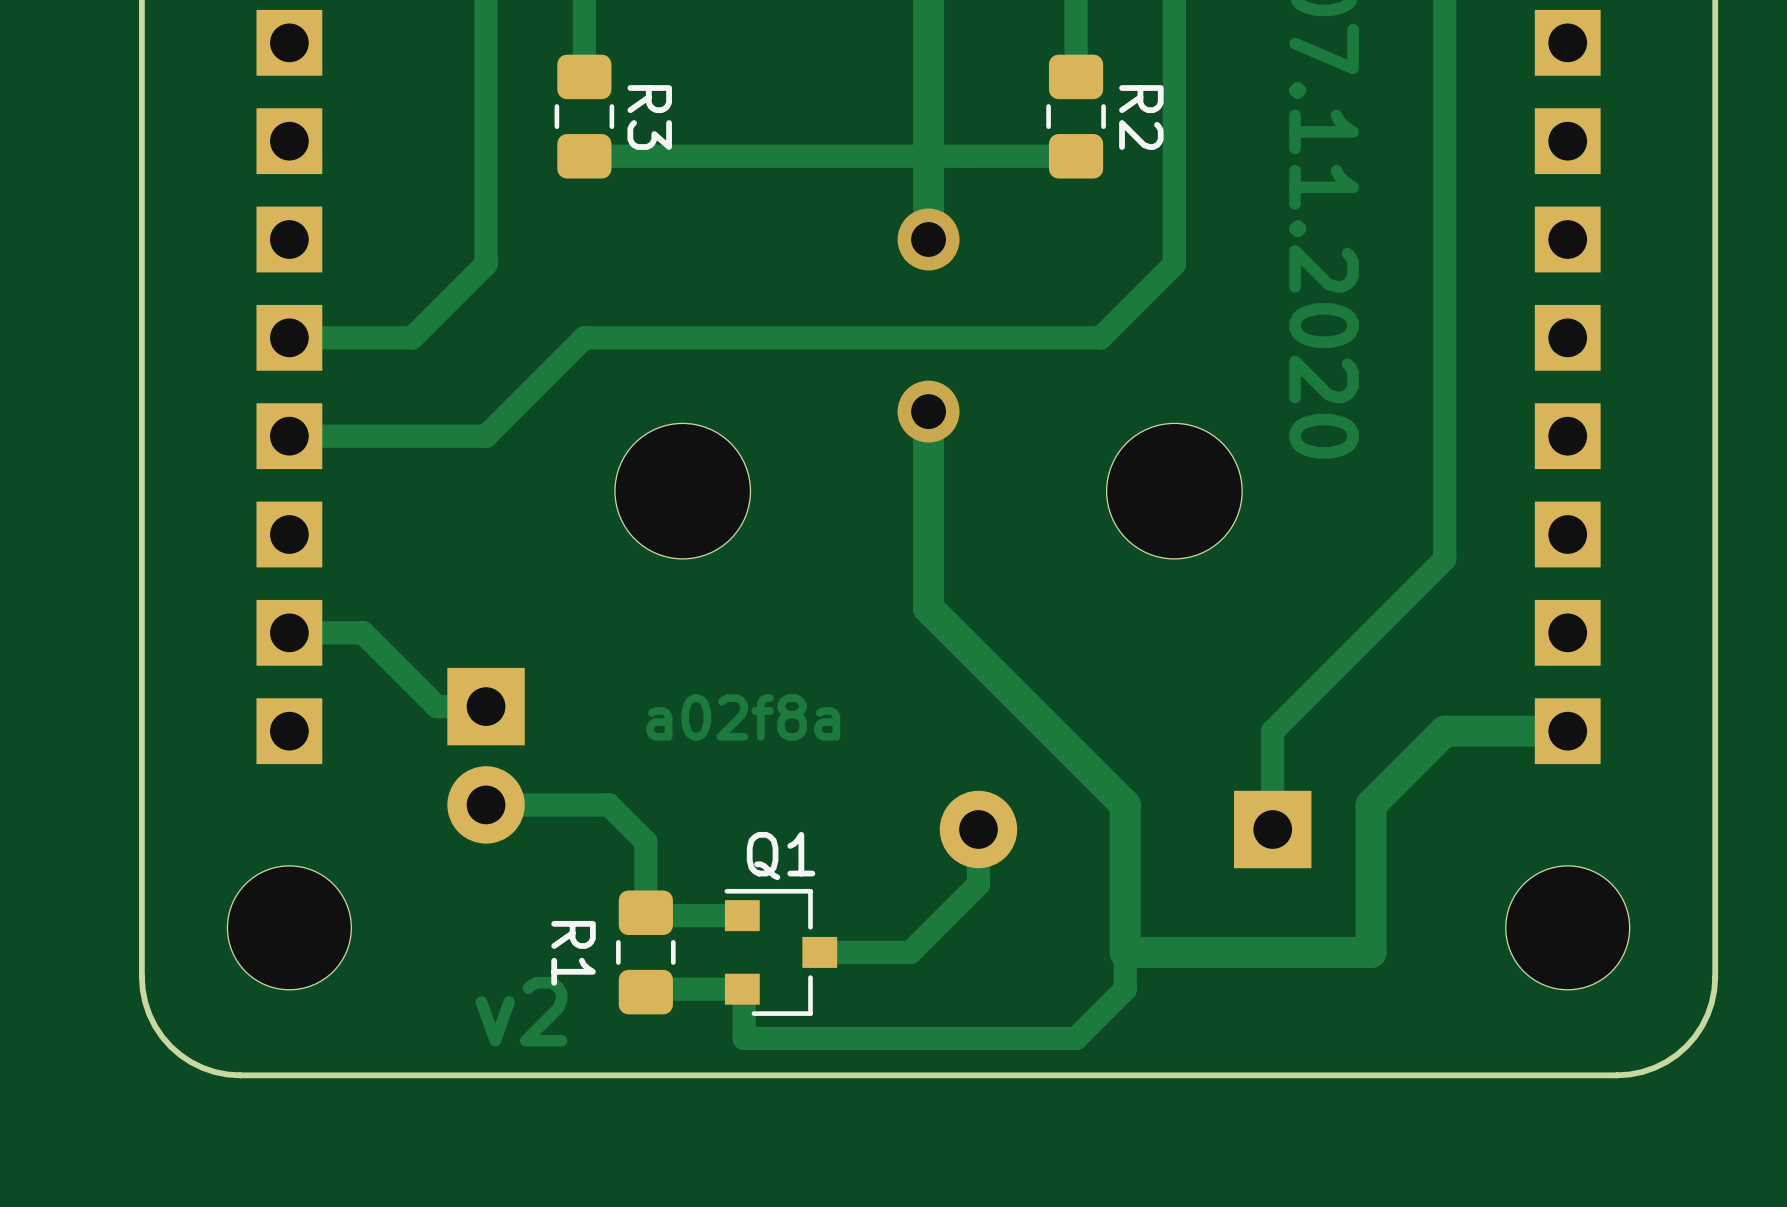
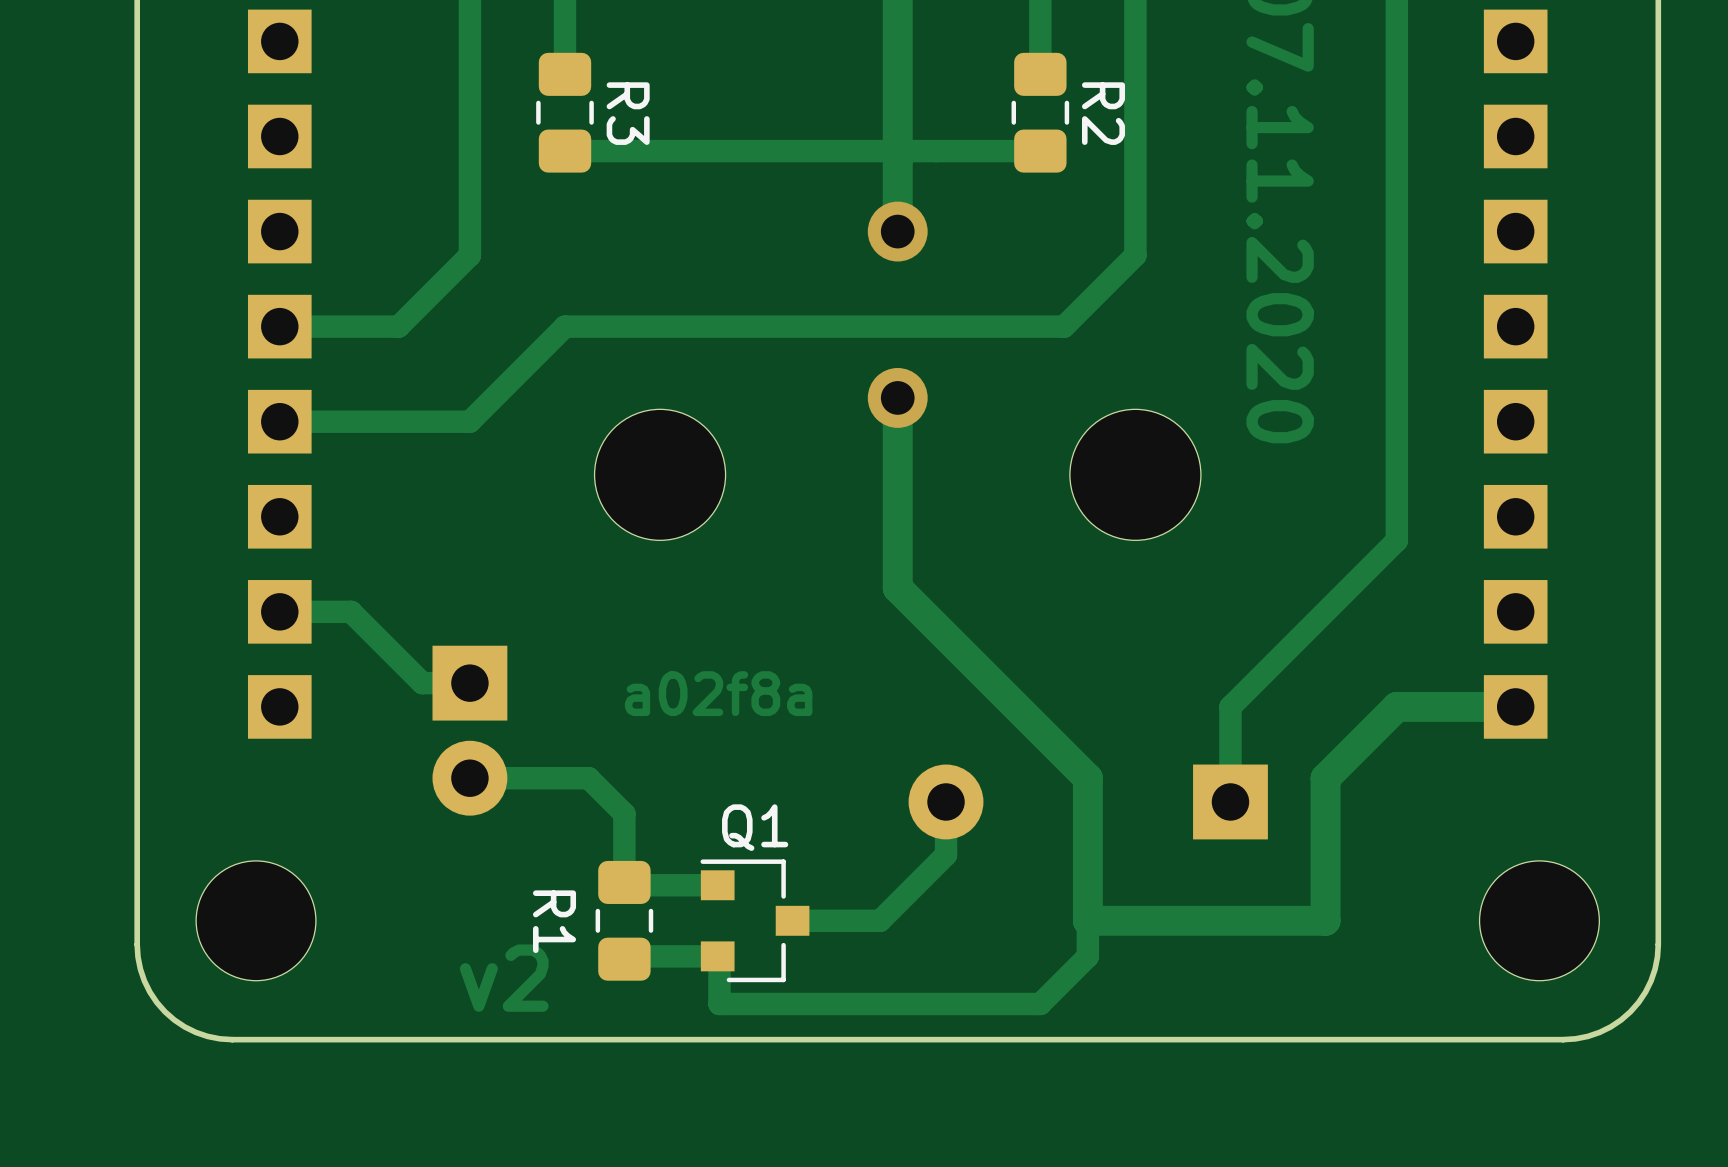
part position: (289, 927) -> (256, 920)
part position: (1567, 927) -> (1539, 920)

